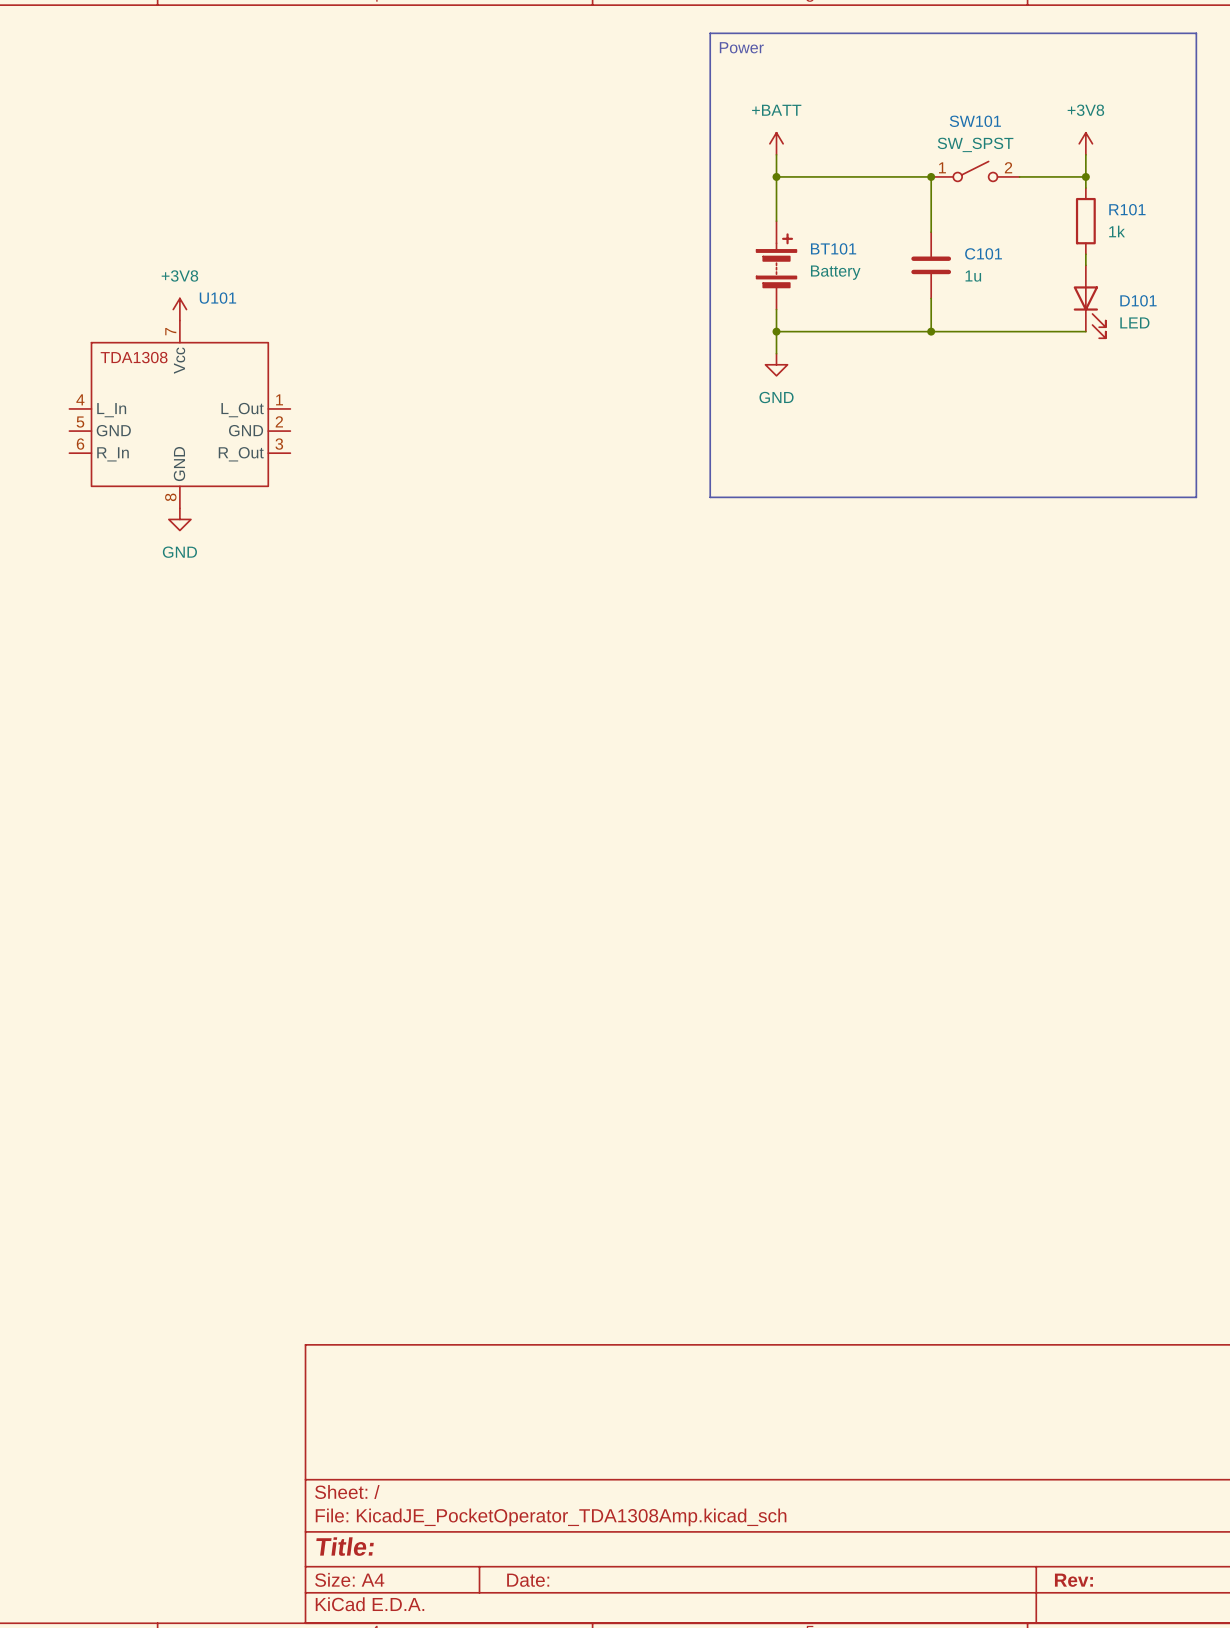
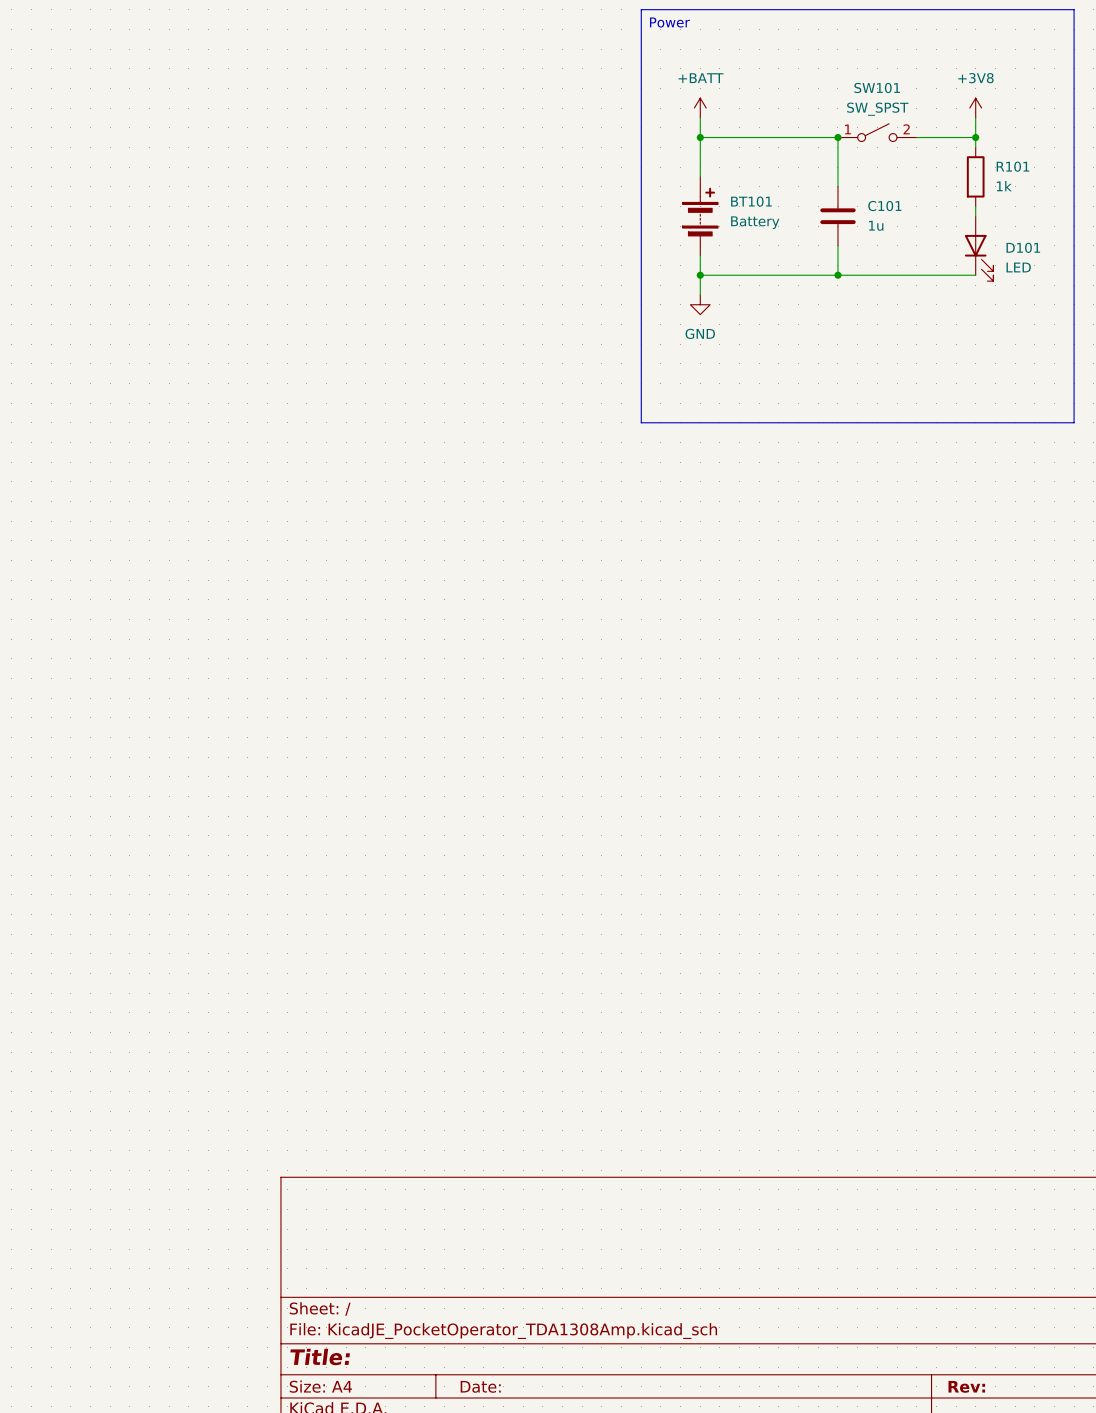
power symbol: +3V8 (179, 309) -> none
U101: (179, 414) -> none
power symbol: GND (179, 519) -> none

